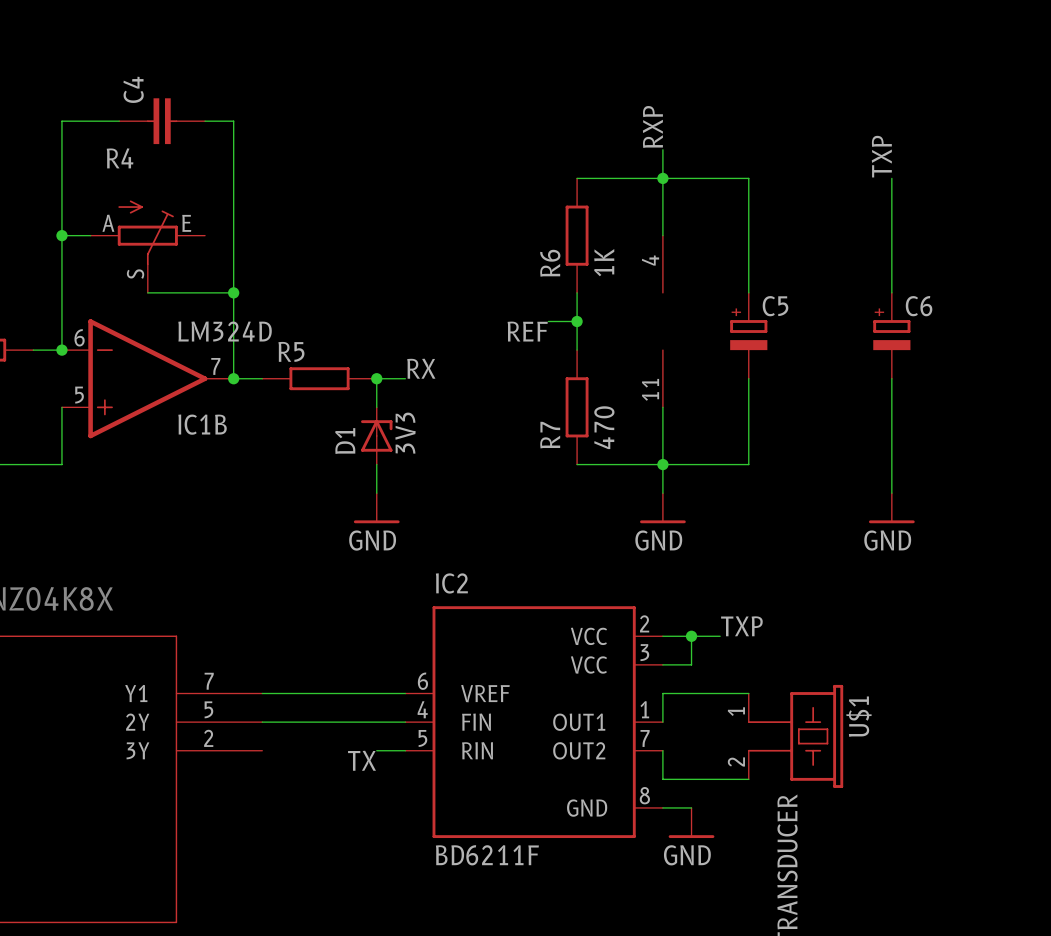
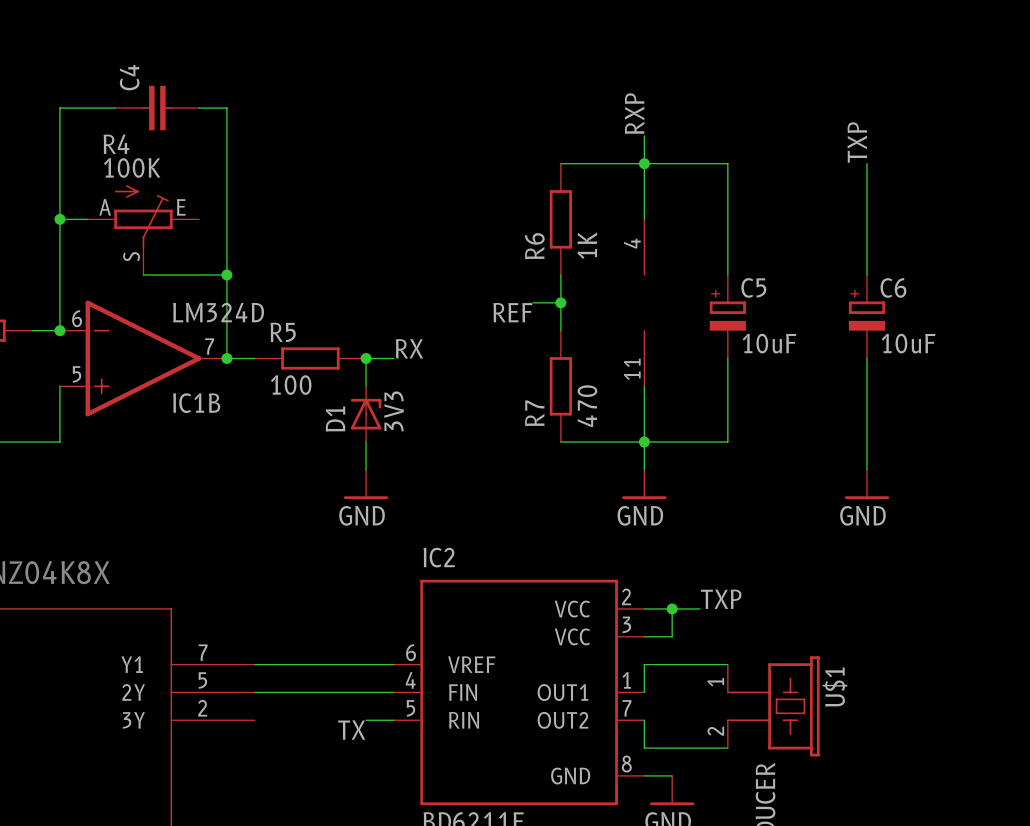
R4 value: none -> 100K (132, 167)
C5 value: none -> 10uF (769, 343)
C6 value: none -> 10uF (908, 343)
R5 value: none -> 100 (291, 385)

